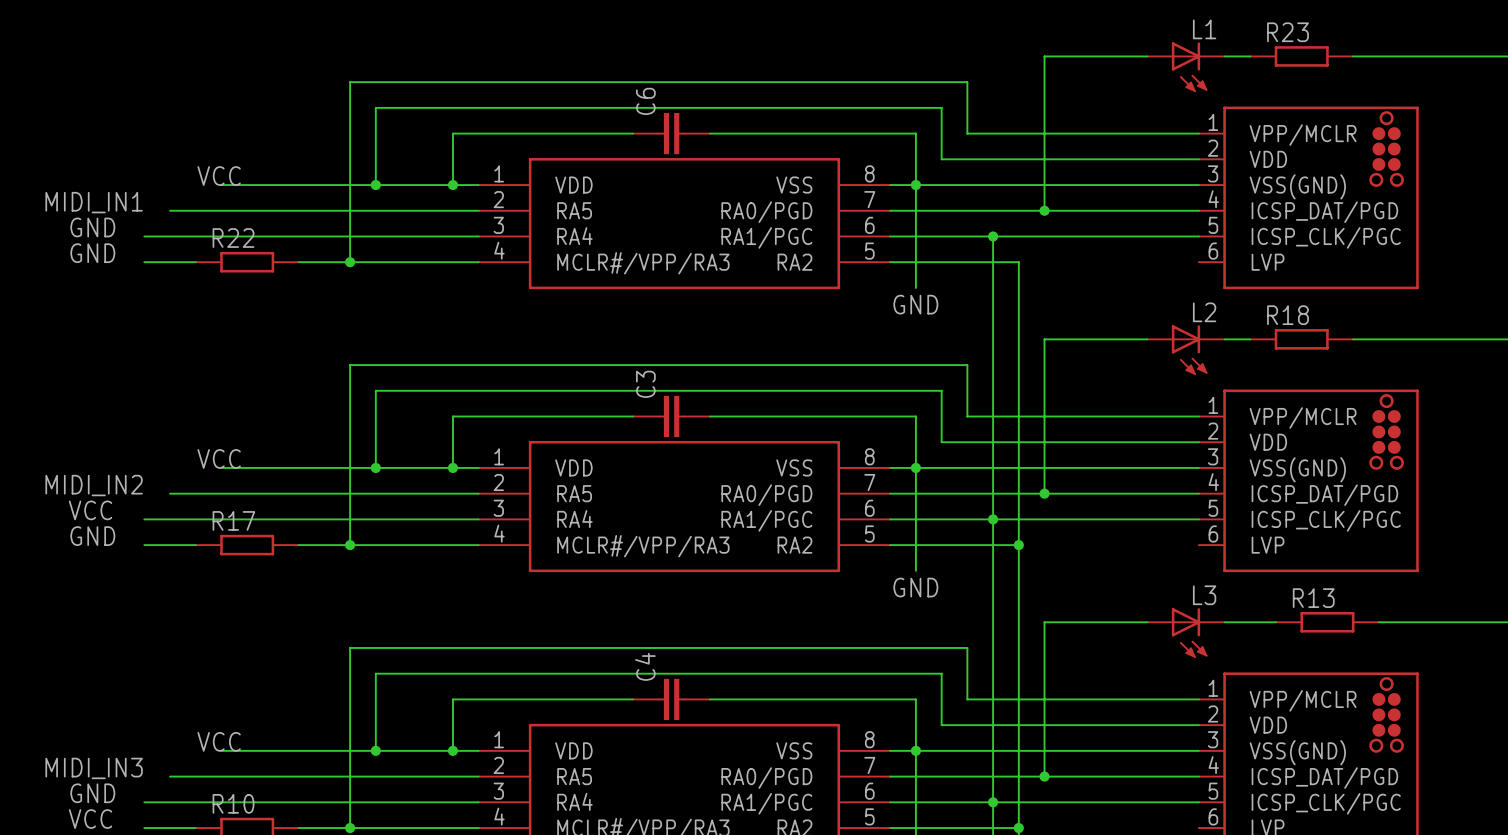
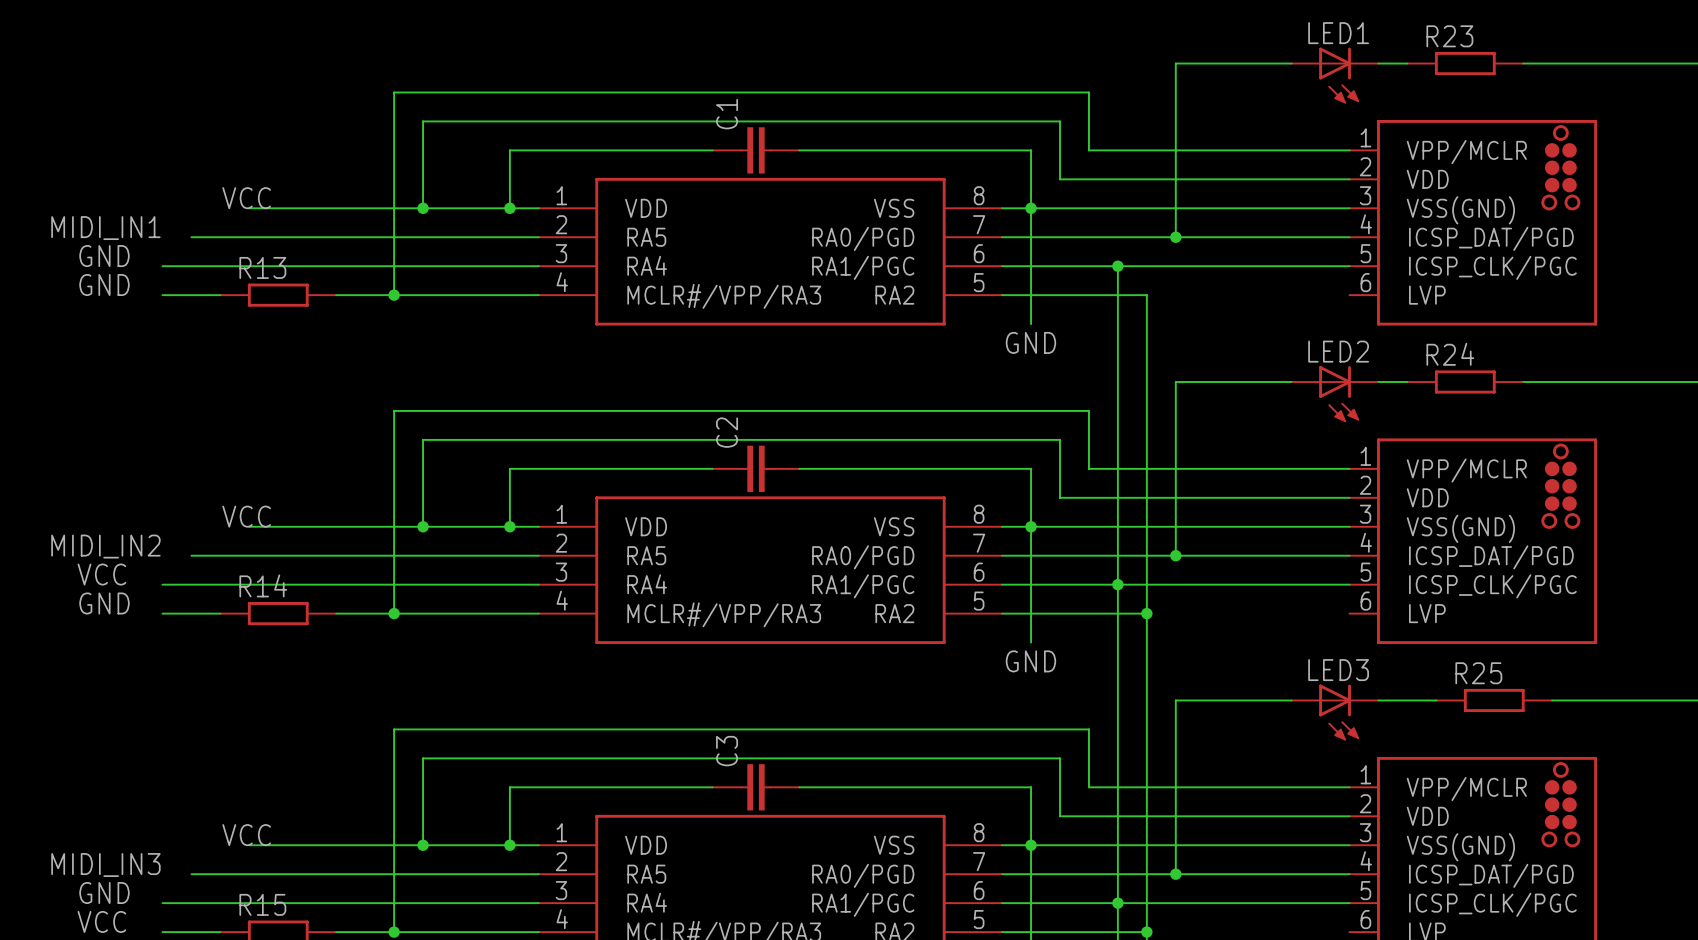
L1 name: L1 (1204, 29) -> LED1 (1338, 33)
C6 name: C6 (645, 101) -> C1 (727, 114)
R22 name: R22 (233, 238) -> R13 (262, 267)
L2 name: L2 (1204, 312) -> LED2 (1338, 351)
R18 name: R18 (1288, 315) -> R24 (1450, 354)
C3 name: C3 (645, 384) -> C2 (727, 432)
R17 name: R17 (233, 520) -> R14 (263, 585)
L3 name: L3 (1204, 595) -> LED3 (1338, 670)
R13 name: R13 (1313, 598) -> R25 (1478, 673)
C4 name: C4 (645, 666) -> C3 (727, 751)
R10 name: R10 (233, 803) -> R15 (262, 904)

